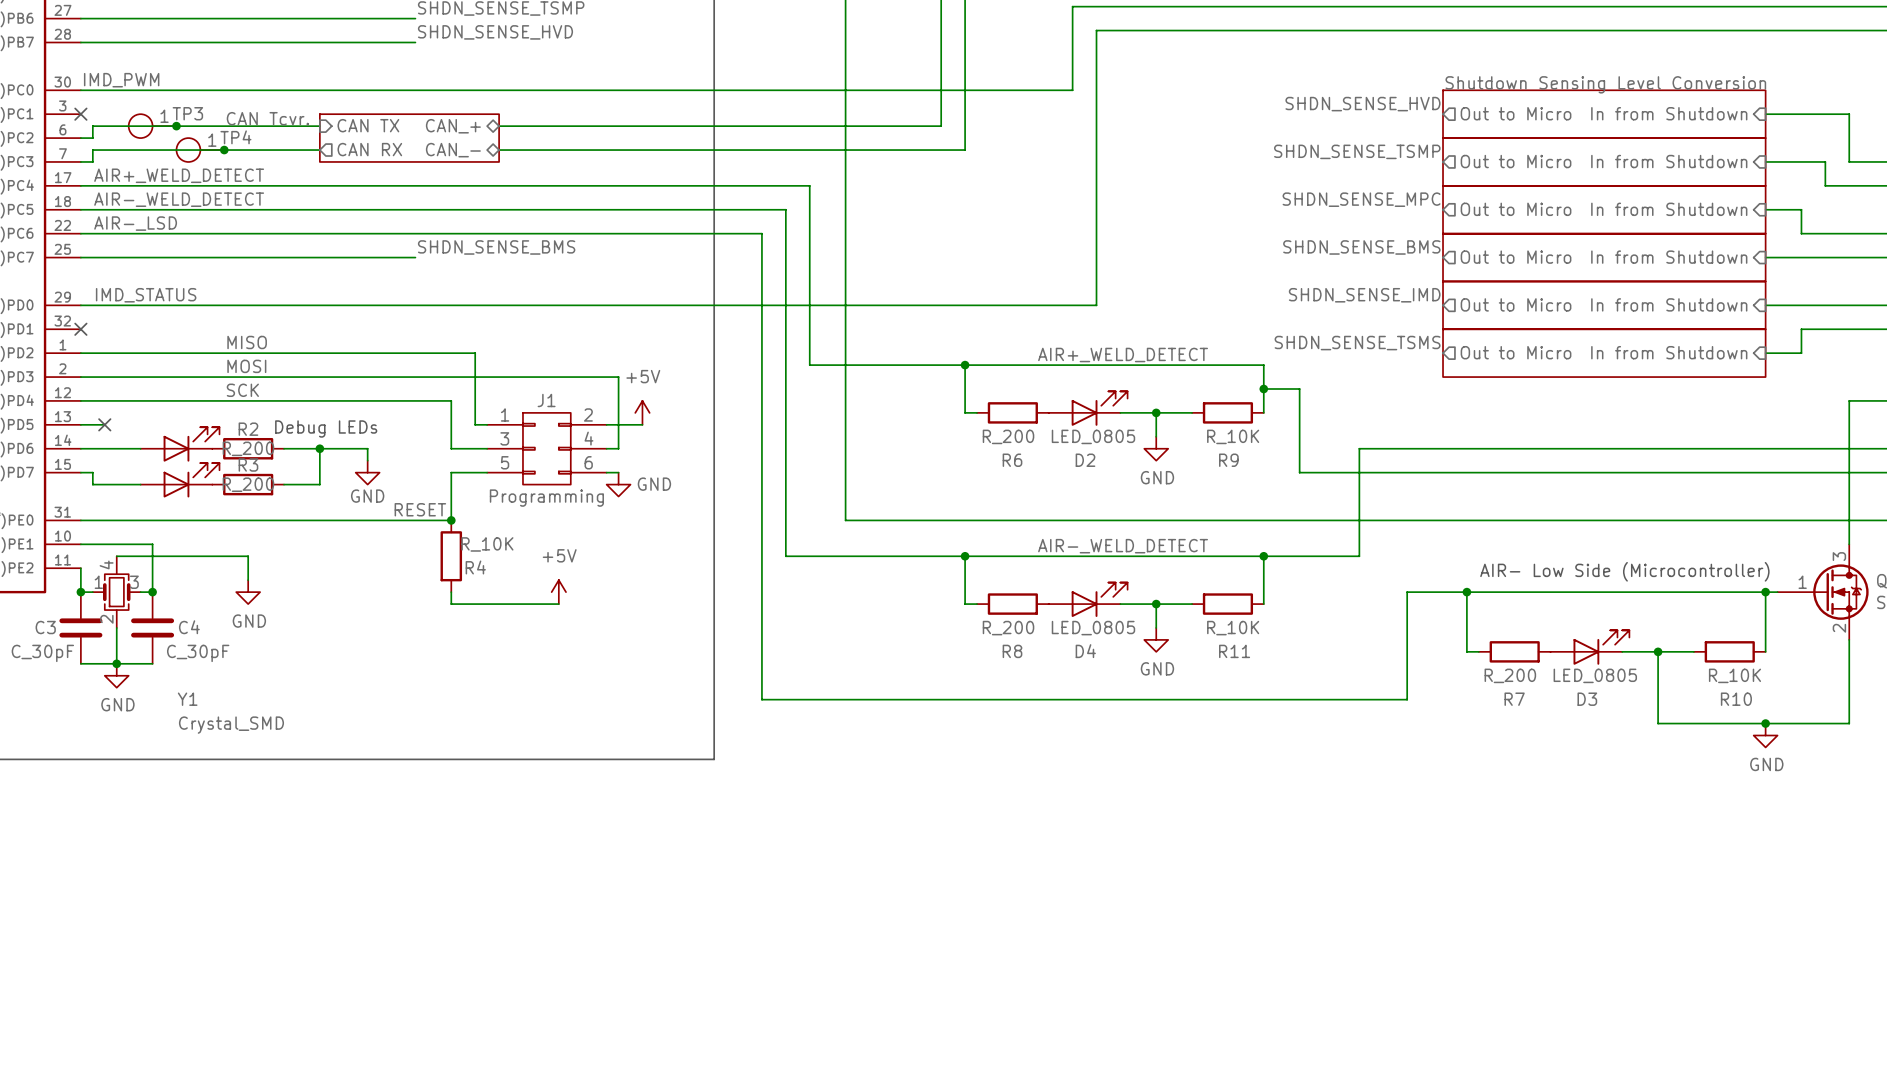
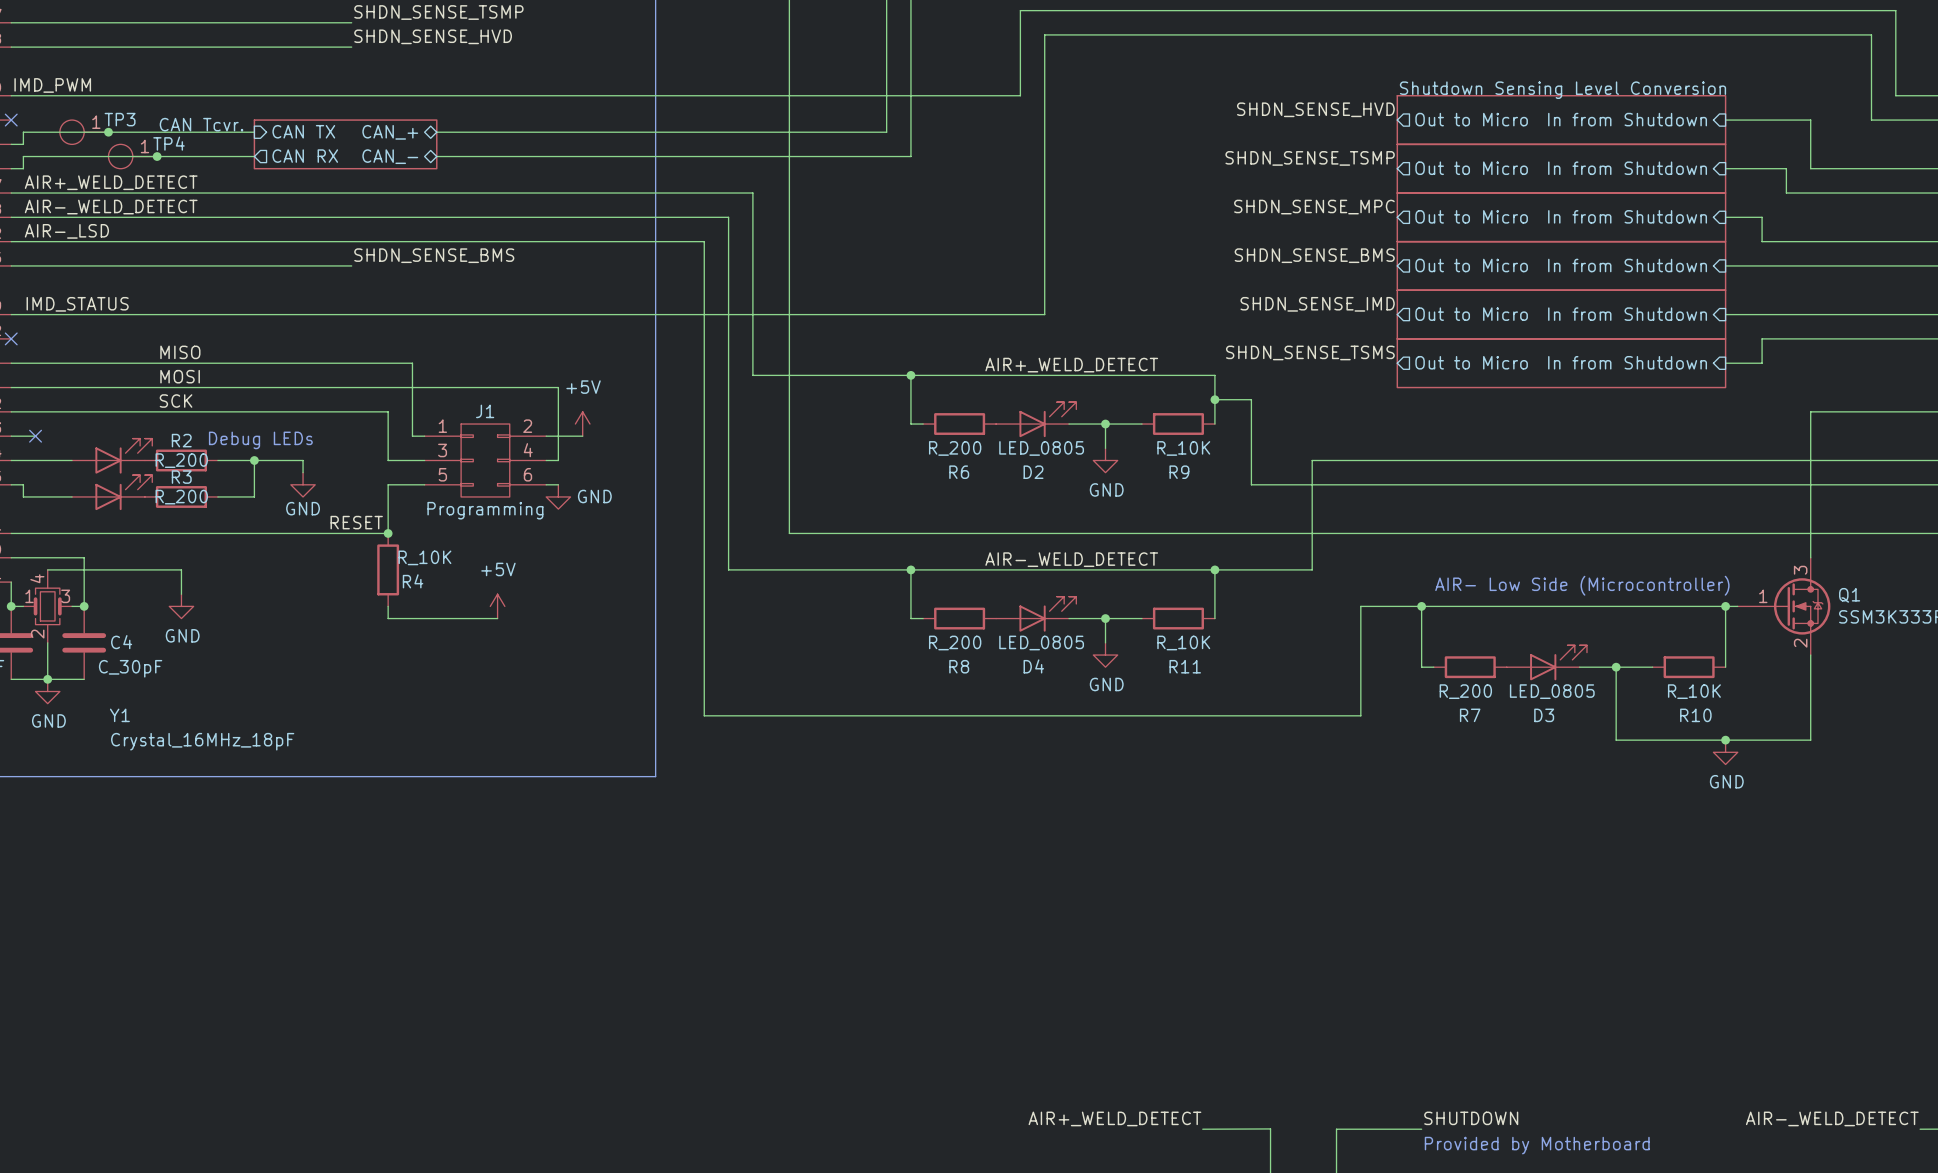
Y1 value: Crystal_SMD (231, 725) -> Crystal_16MHz_18pF (202, 741)

